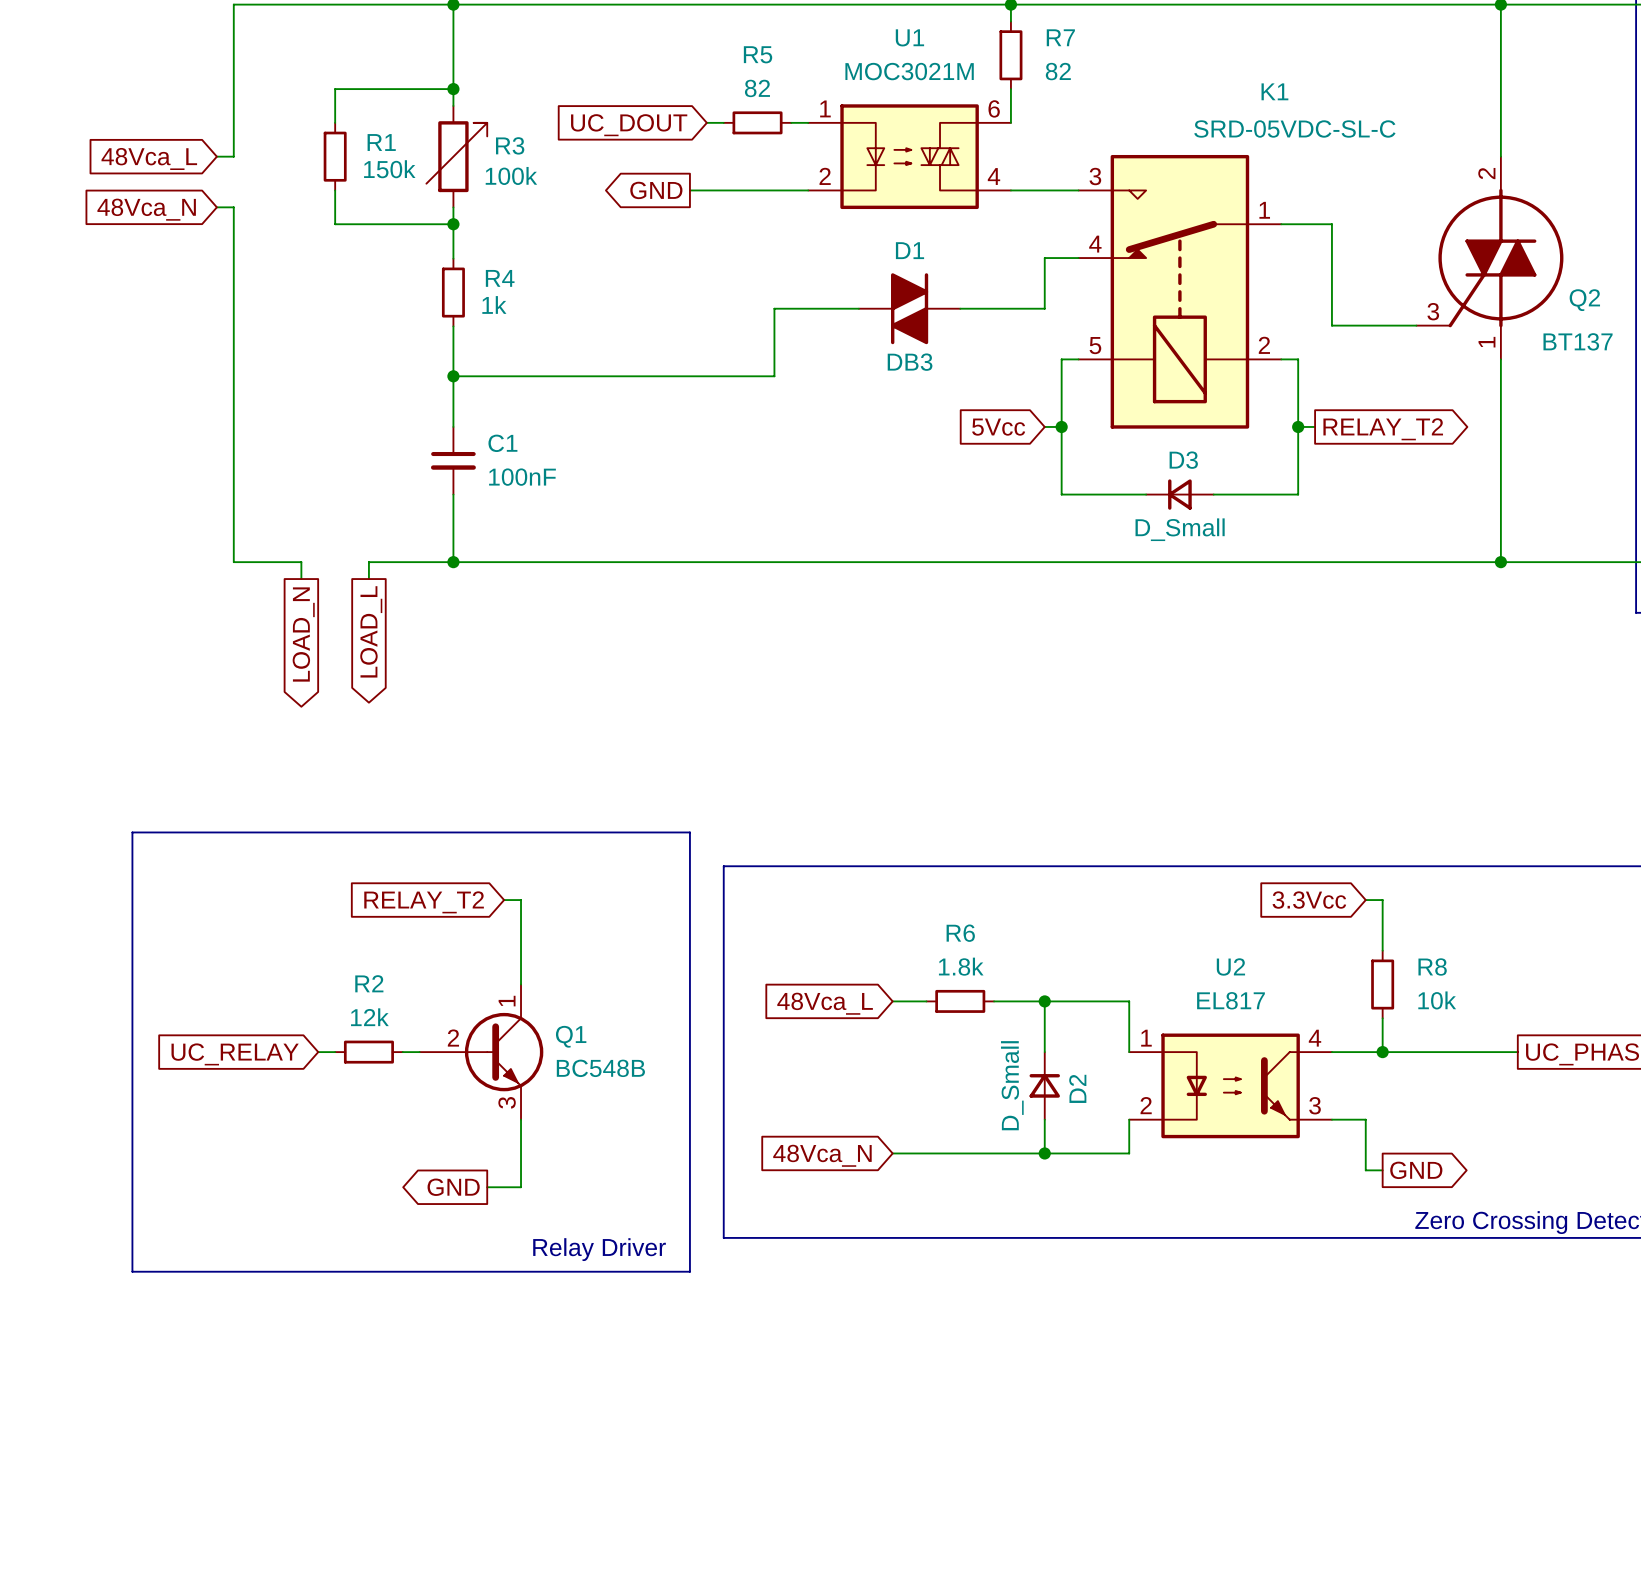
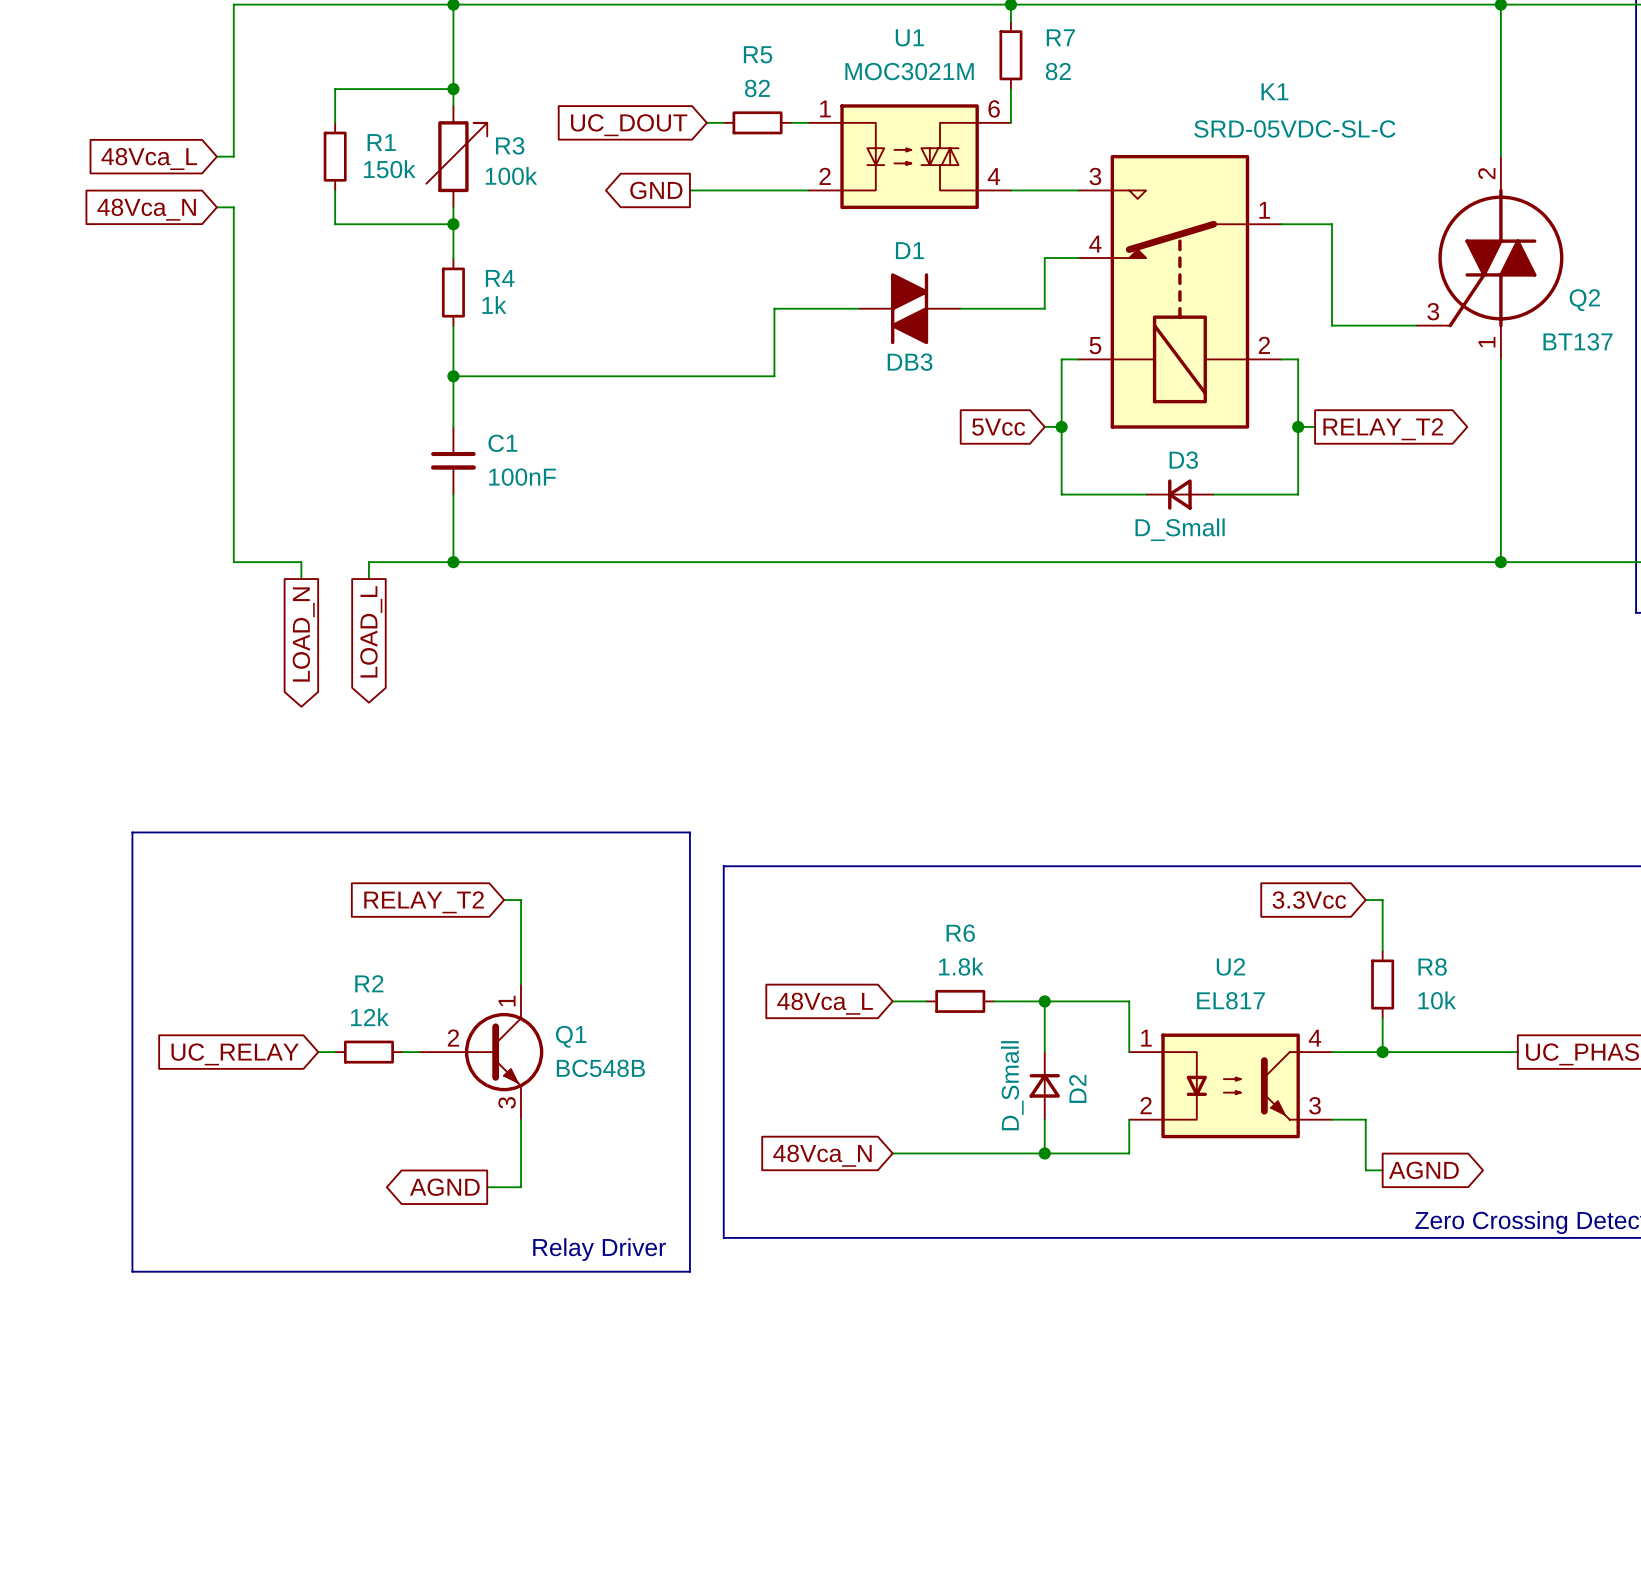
global label: GND (1416, 1170) -> AGND (1423, 1170)
global label: GND (453, 1187) -> AGND (444, 1187)

